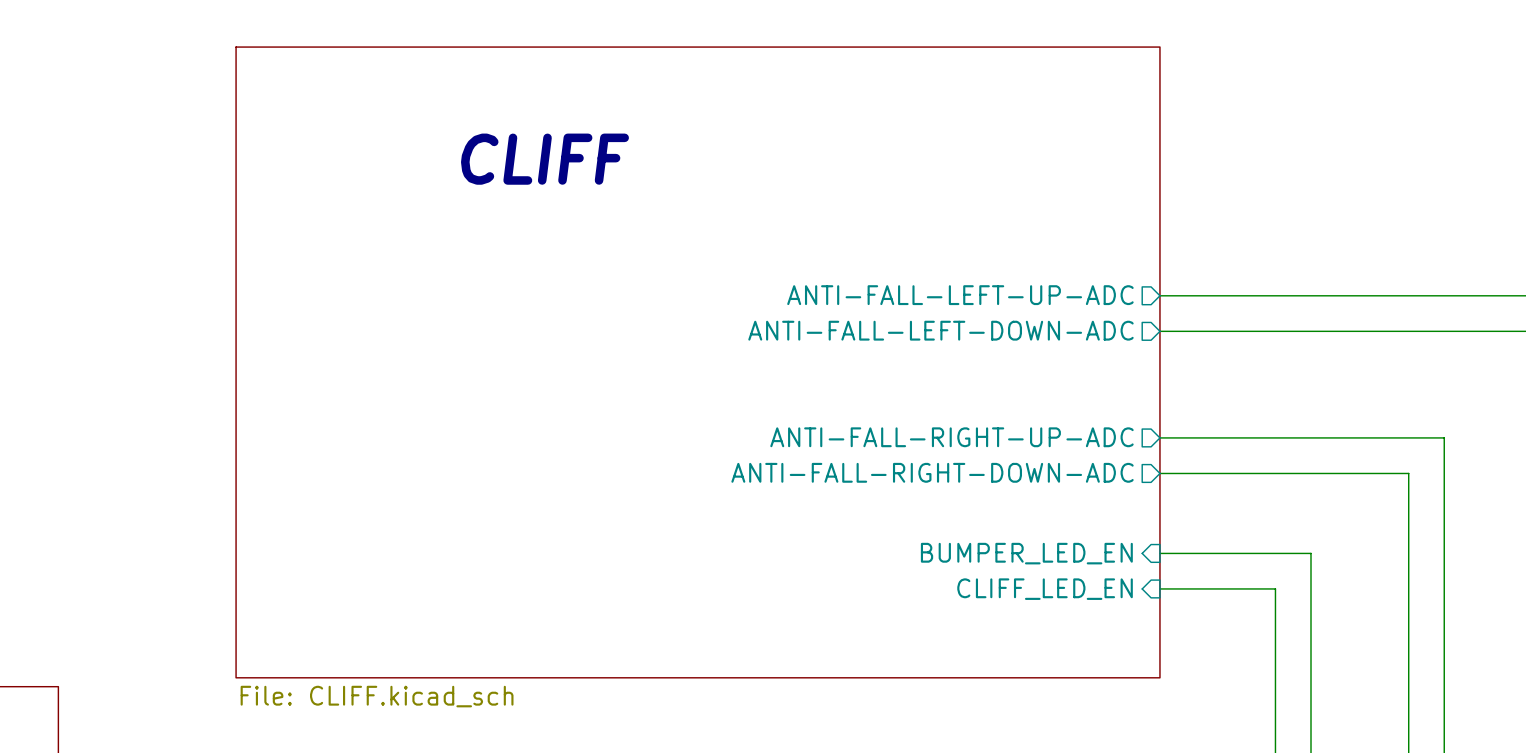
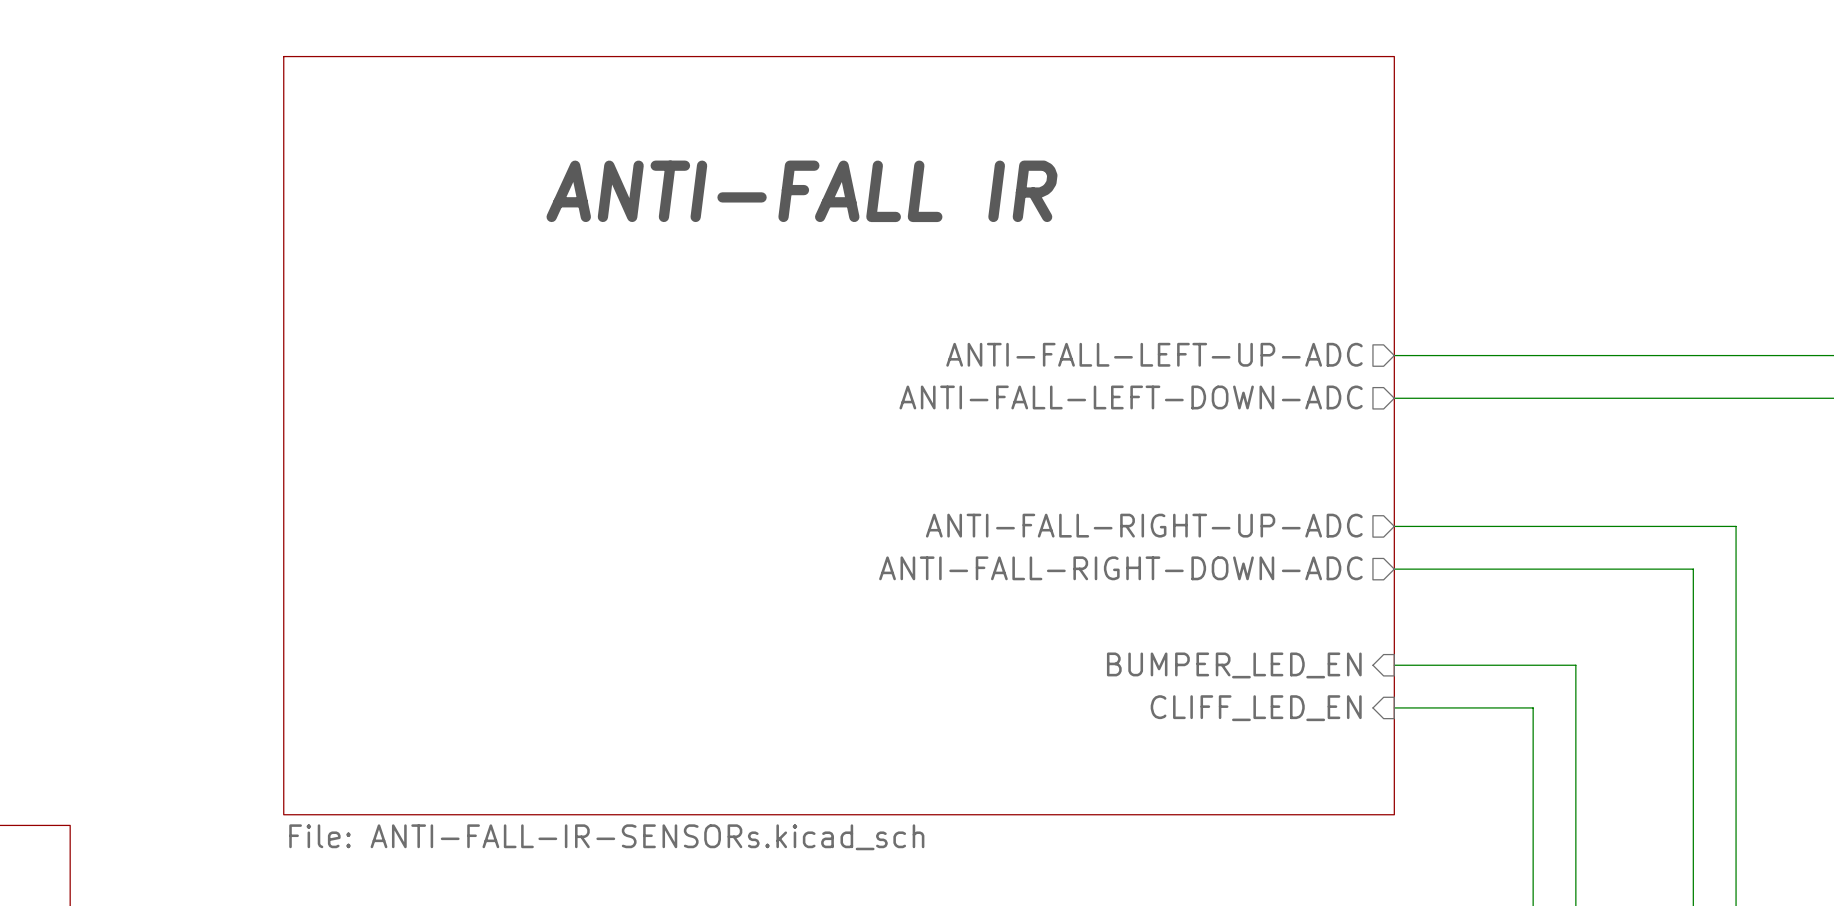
text: CLIFF (544, 159) -> ANTI-FALL IR (802, 191)
sheet value: File: CLIFF.kicad_sch (377, 696) -> File: ANTI-FALL-IR-SENSORs.kicad_sch (606, 837)

